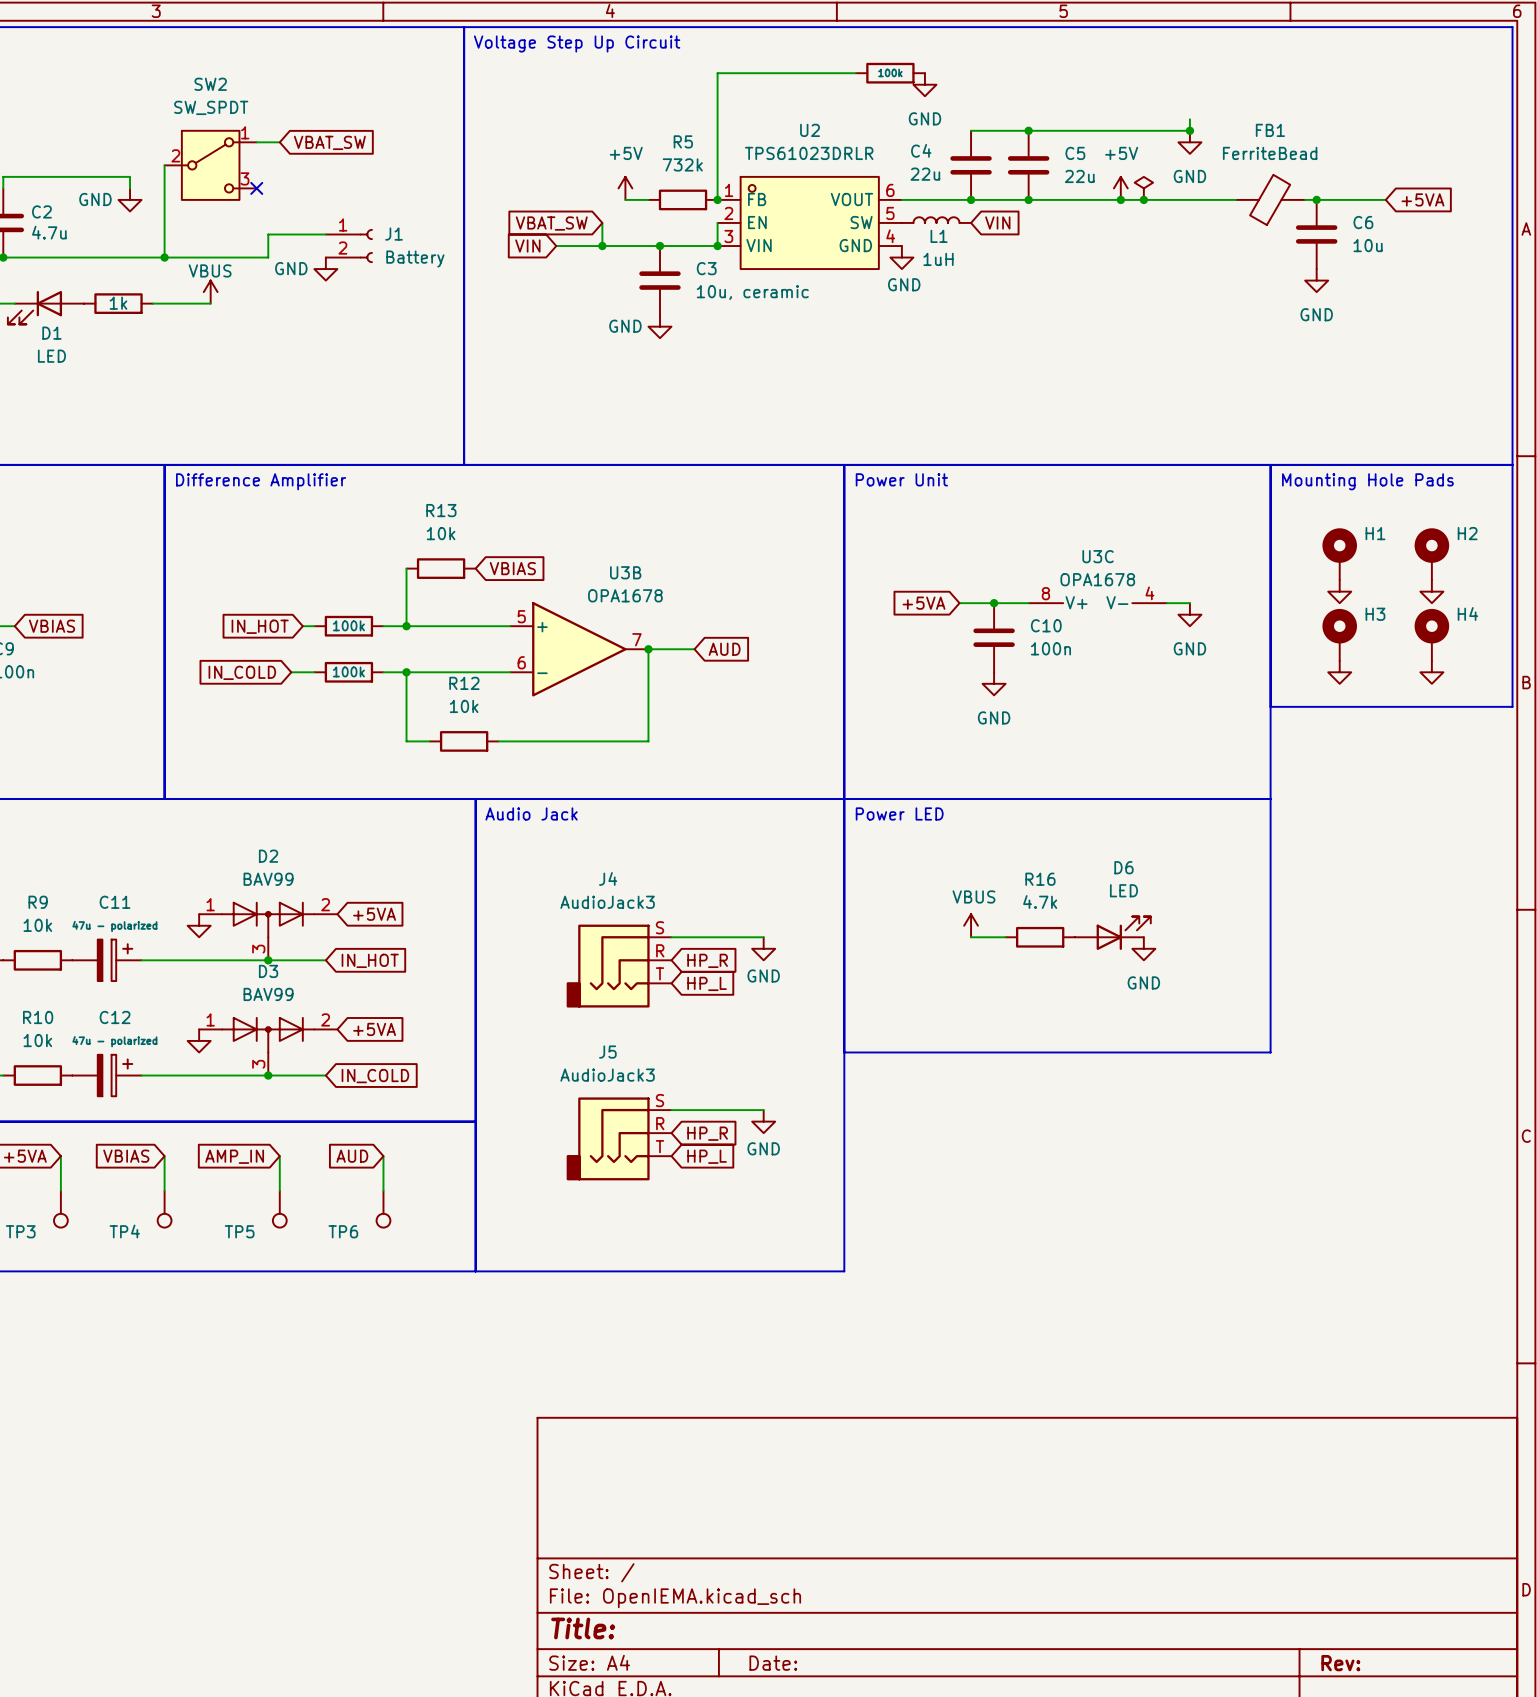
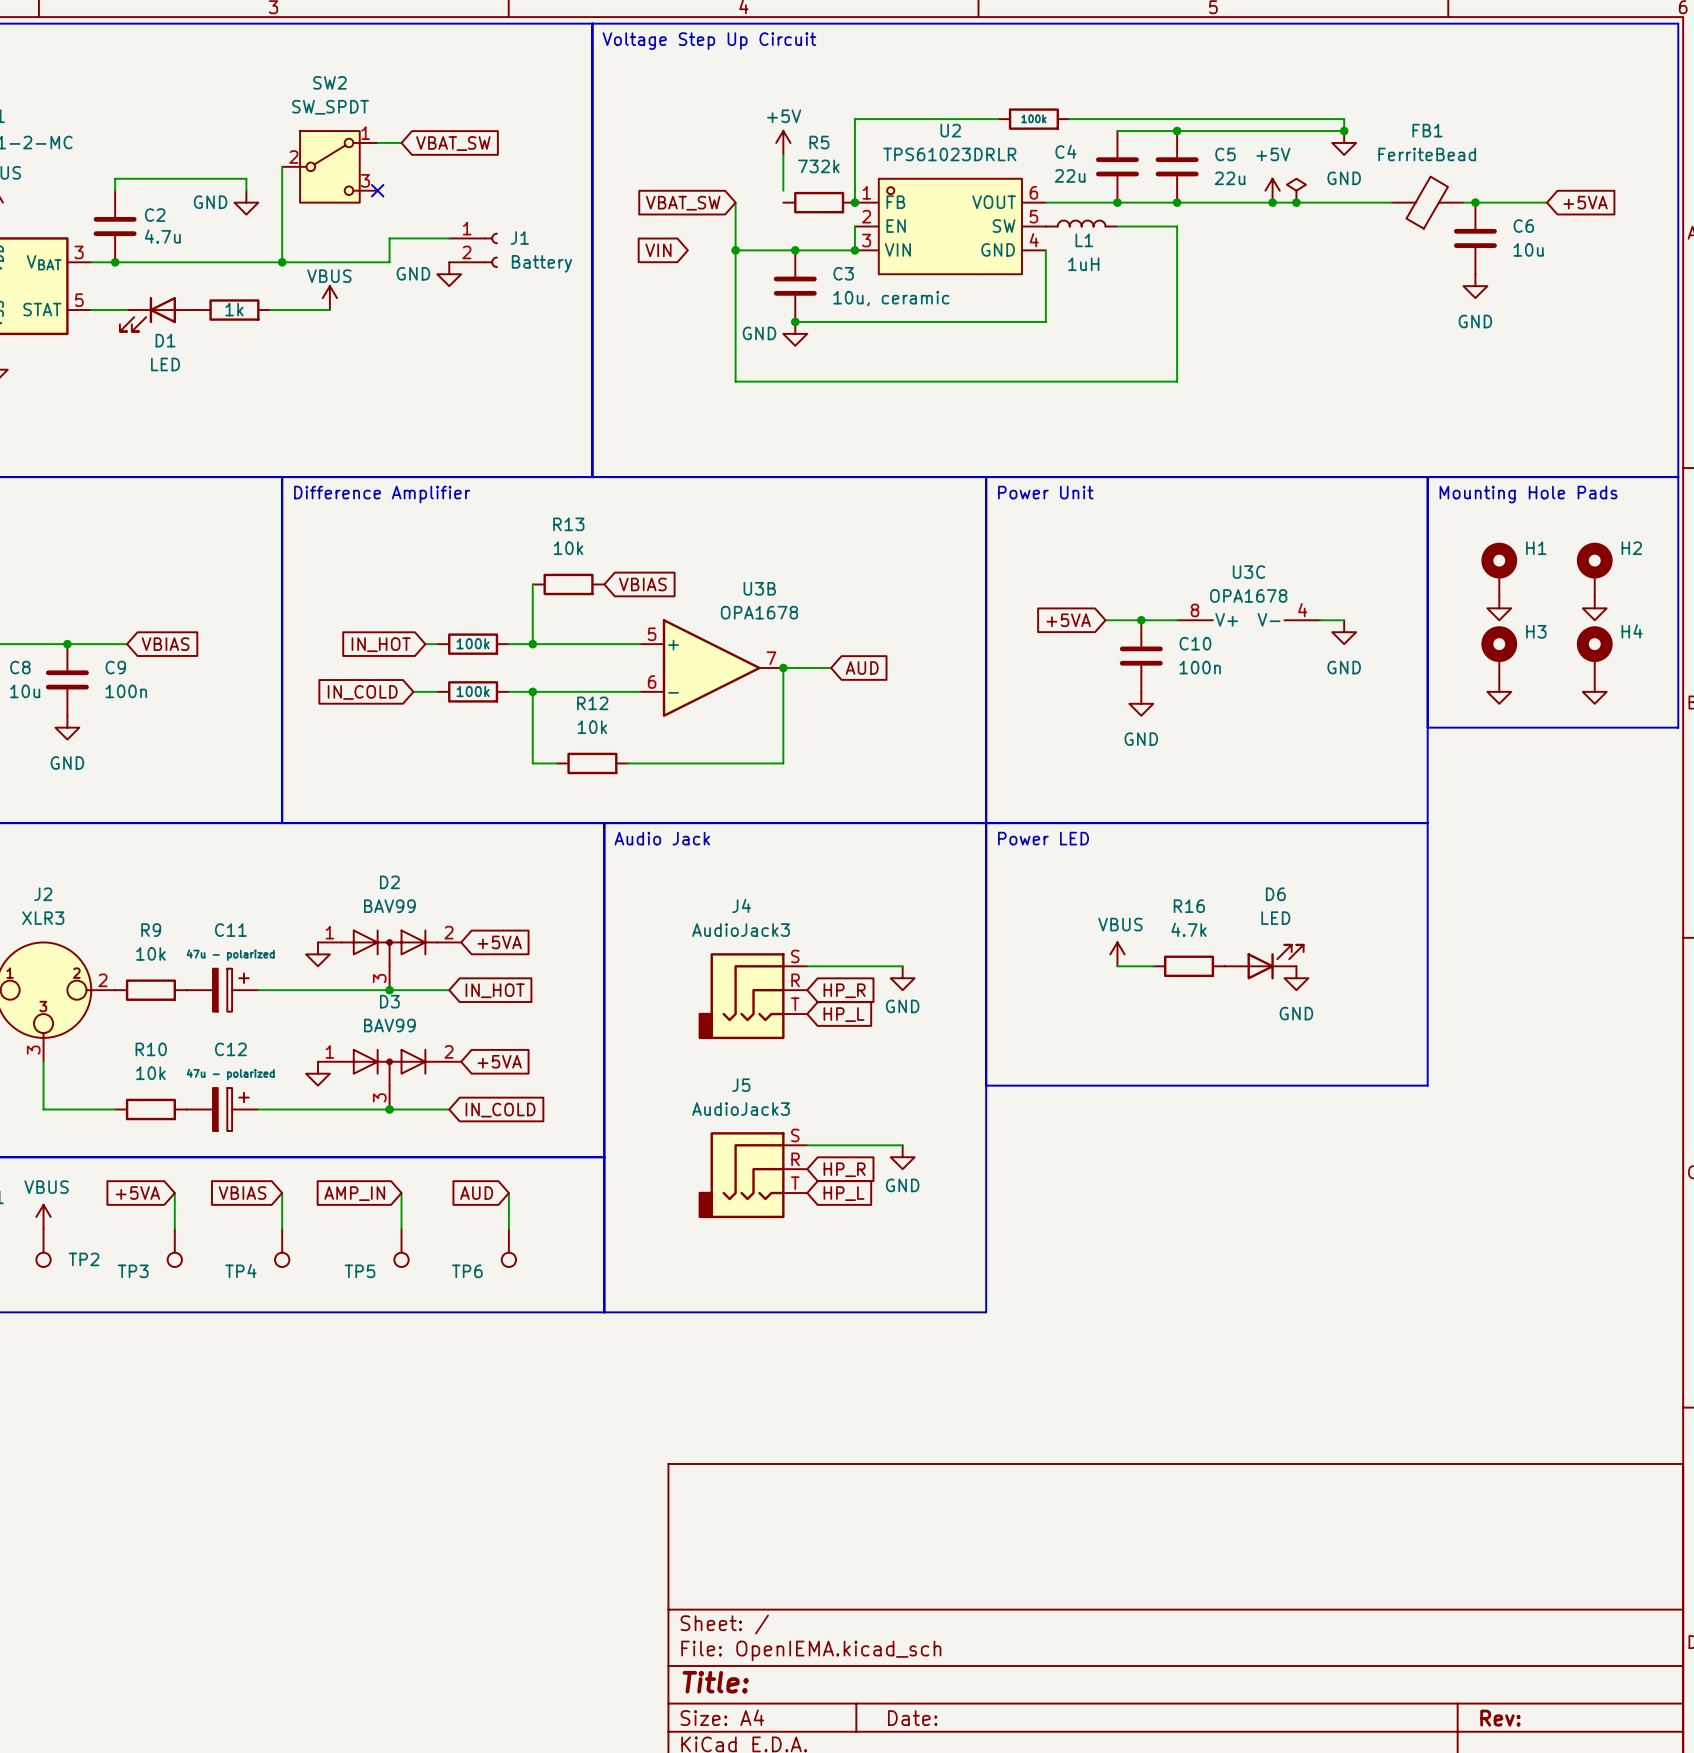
wire: (855, 73) (717, 73) (717, 119) -> (998, 119) (854, 119)
part position: (890, 73) -> (1033, 119)
power symbol: GND (924, 84) -> none
wire: none -> (1069, 119) (1344, 119)
power symbol text position: +5V (626, 153) -> +5V (784, 116)
wire: none -> (783, 154) (783, 190)
power symbol position: +5V (625, 188) -> +5V (783, 142)
wire: none -> (735, 202) (735, 226)
wire: (625, 199) (648, 199) -> none
global label: VIN (997, 222) -> none
global label position: VBAT_SW (551, 223) -> VBAT_SW (683, 203)
wire: (556, 246) (602, 246) -> (1117, 226) (1177, 226) (1177, 381) (735, 381) (735, 250)
wire: none -> (1045, 250) (1045, 321) (795, 321)
power symbol: GND (901, 257) -> none
junction: none -> (795, 321)

